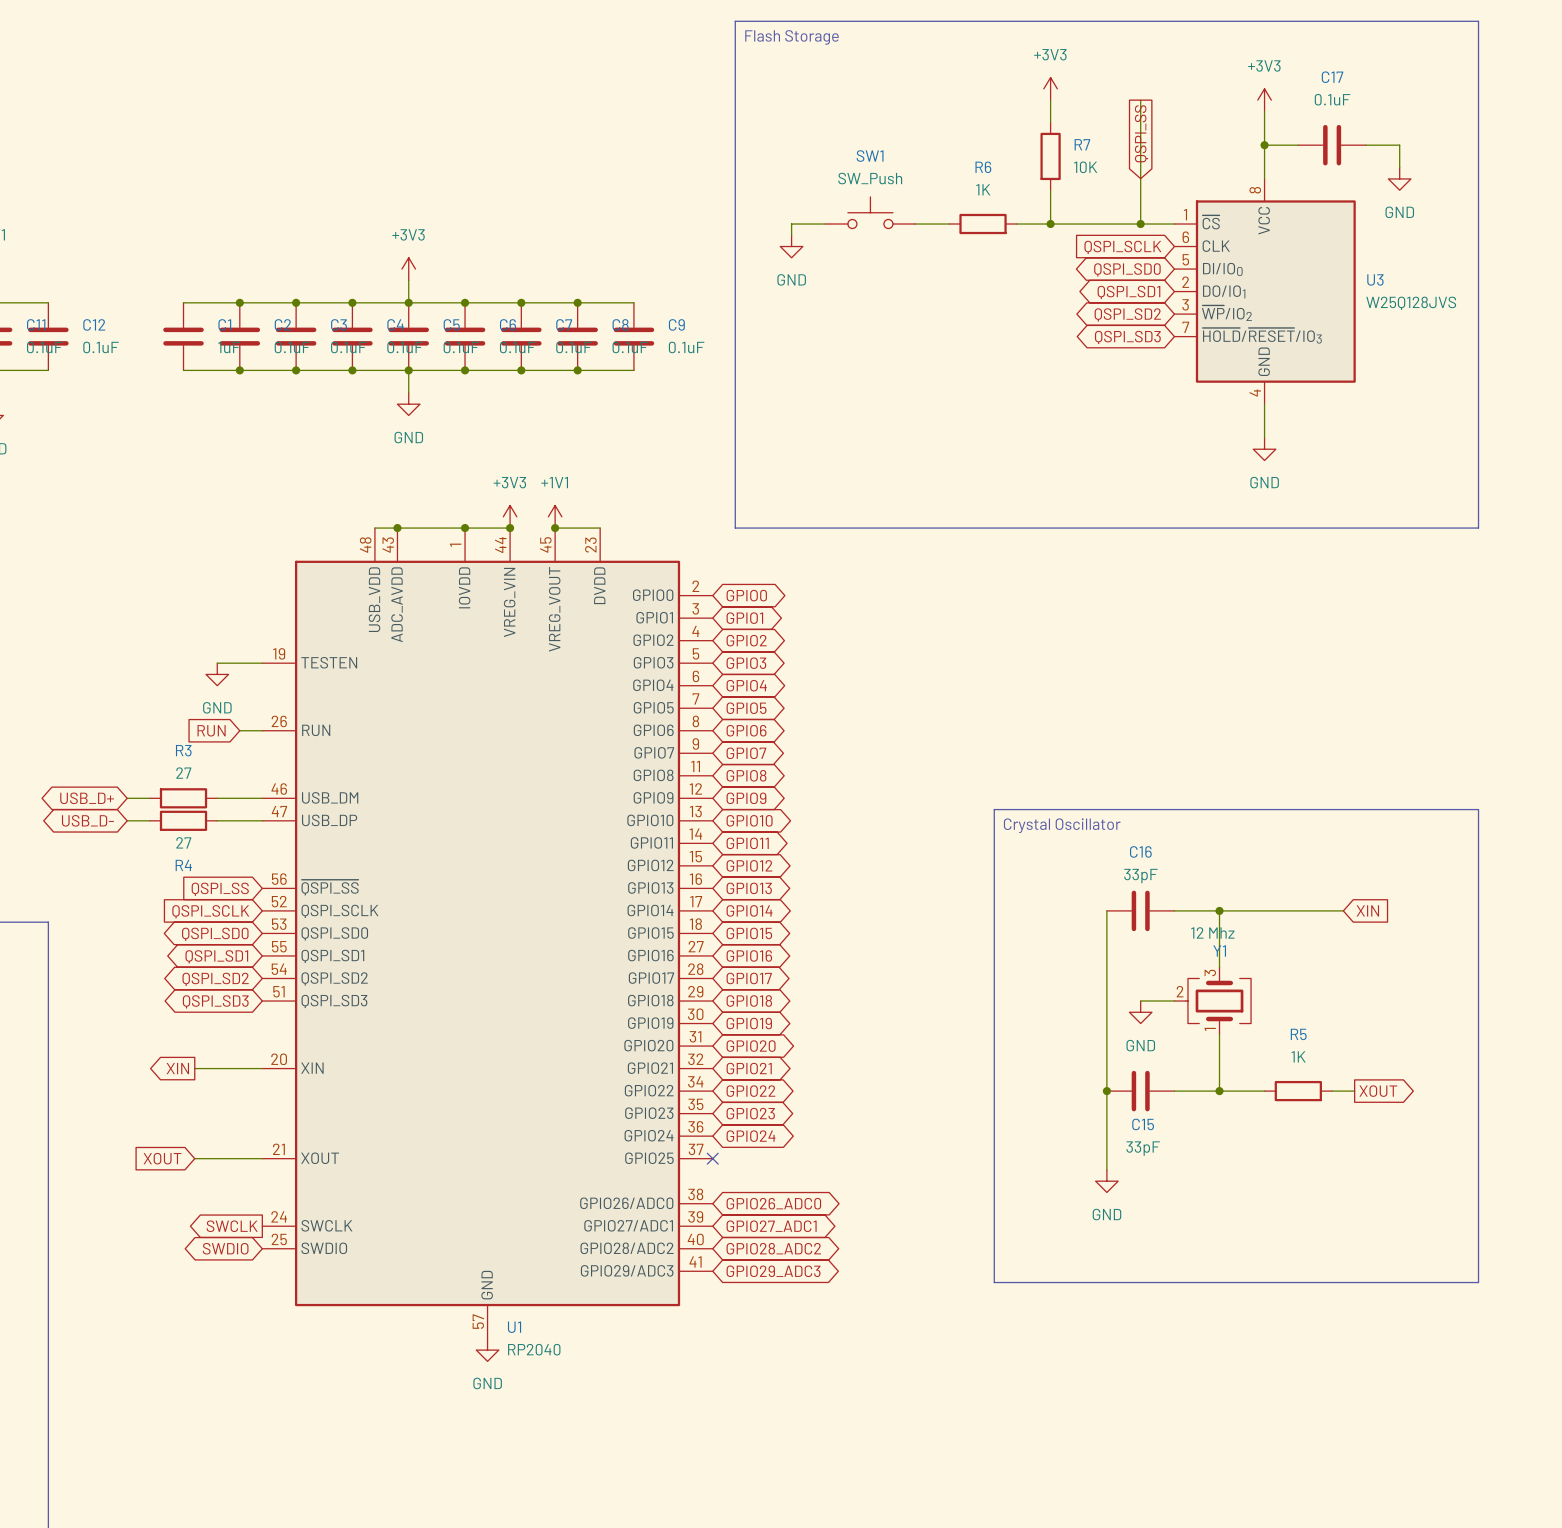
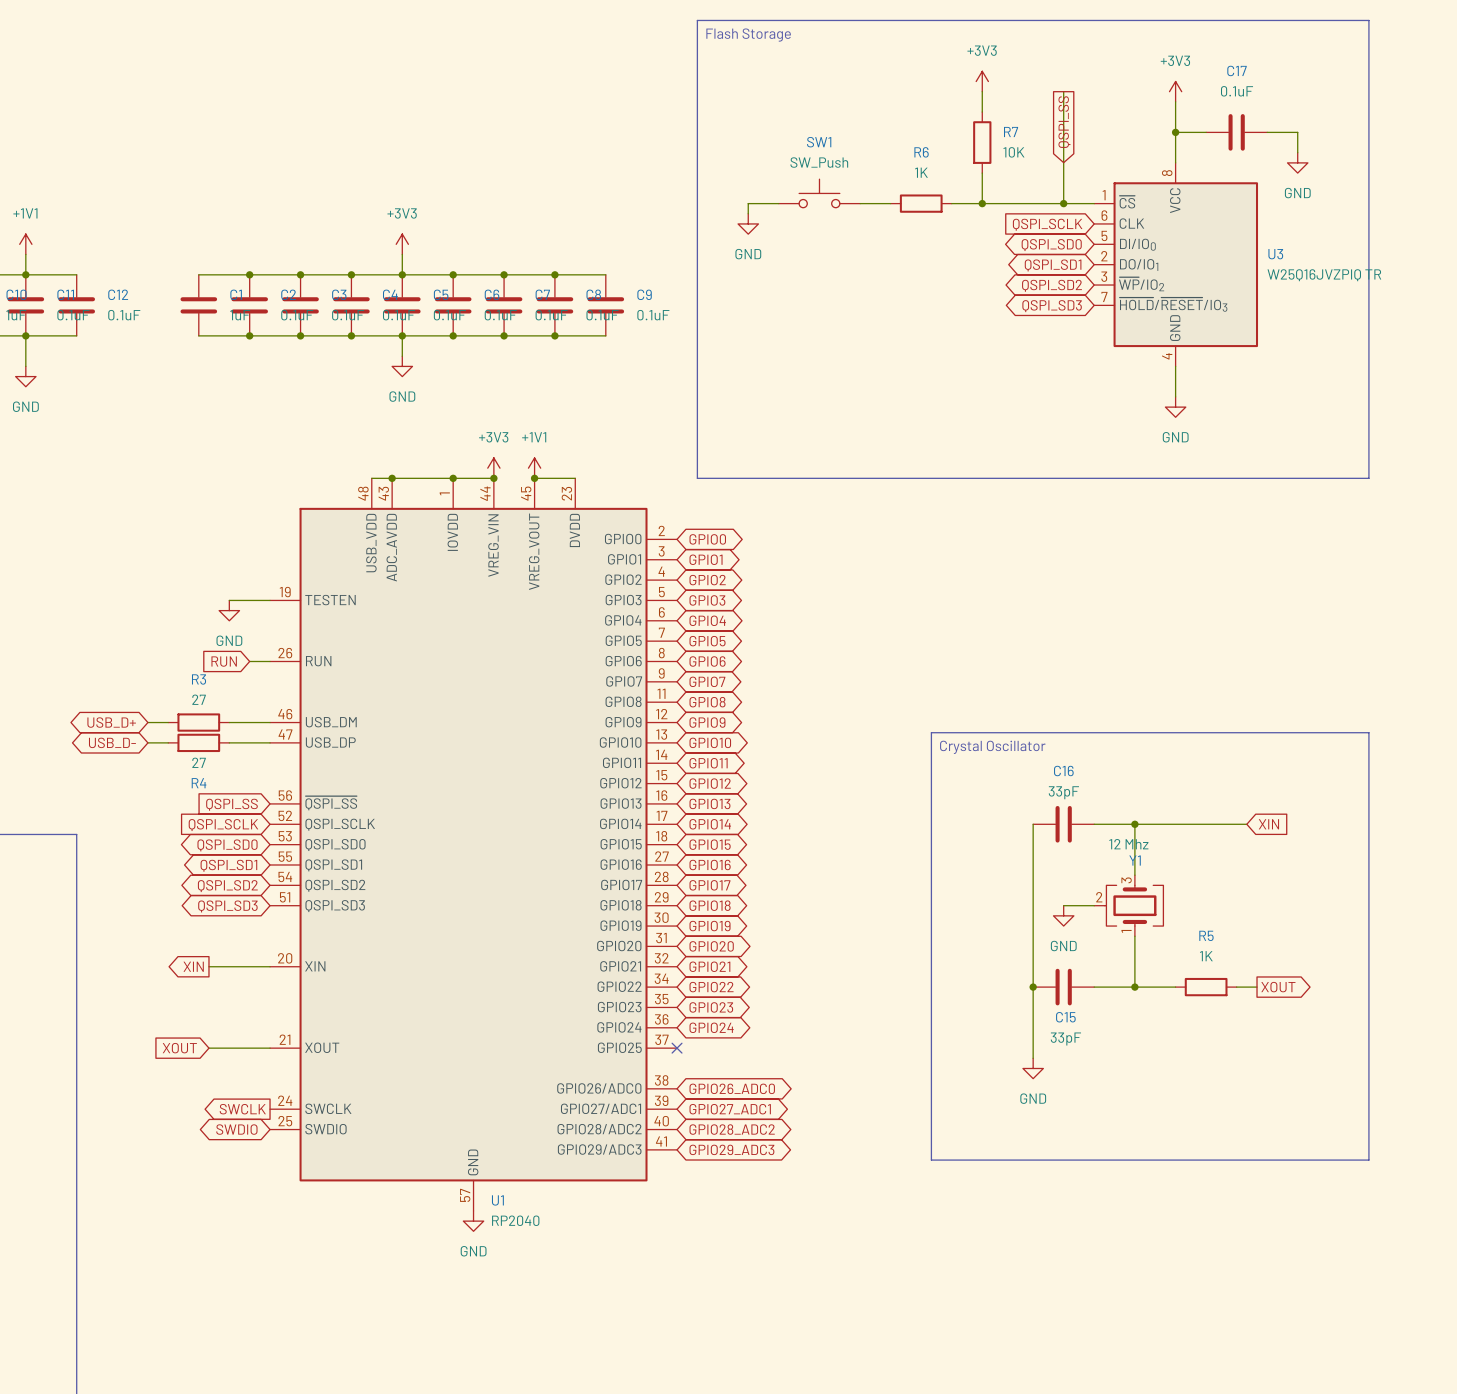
U3 value: W25Q128JVS (1411, 303) -> W25Q16JVZPIQ TR (1324, 275)

